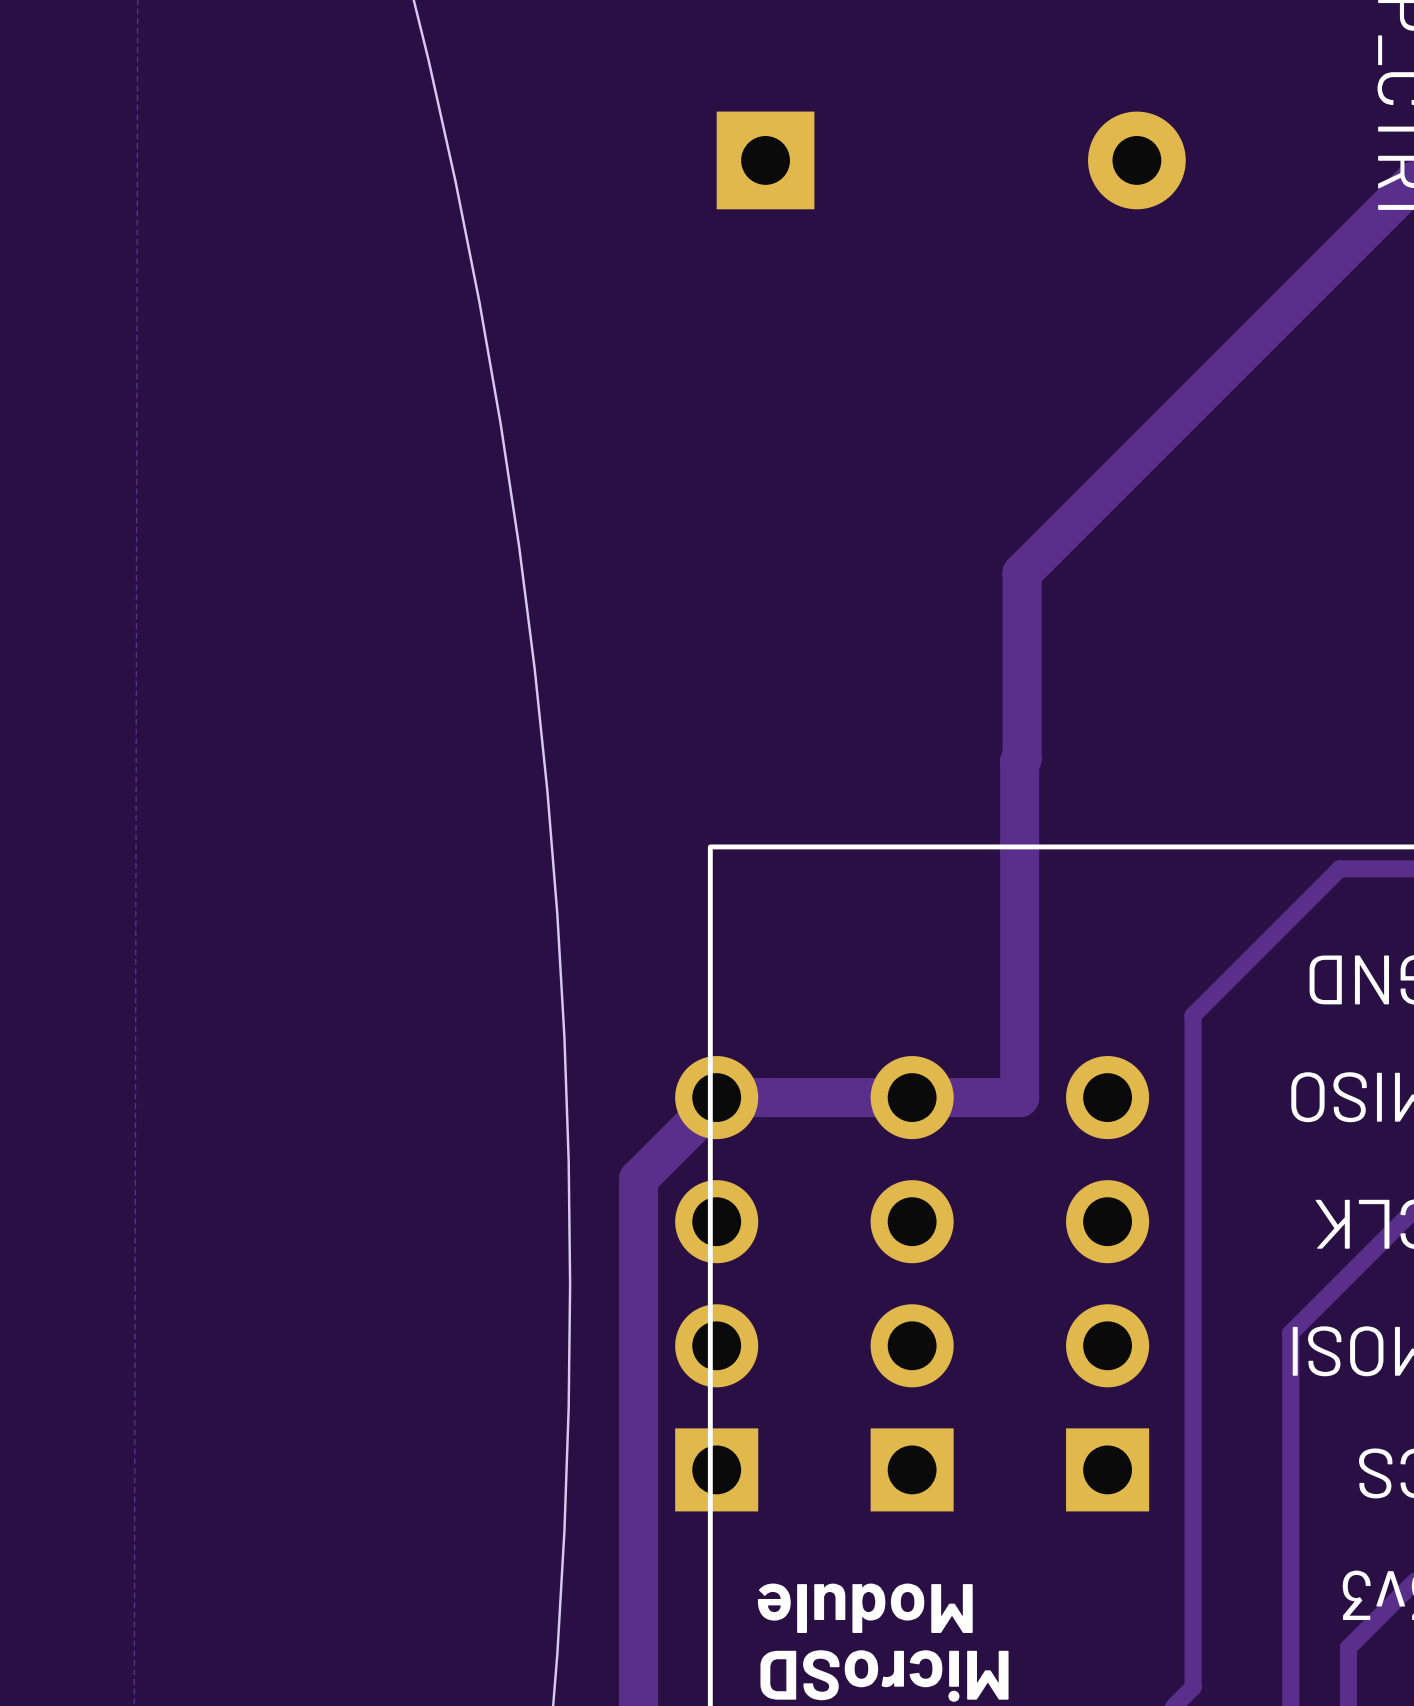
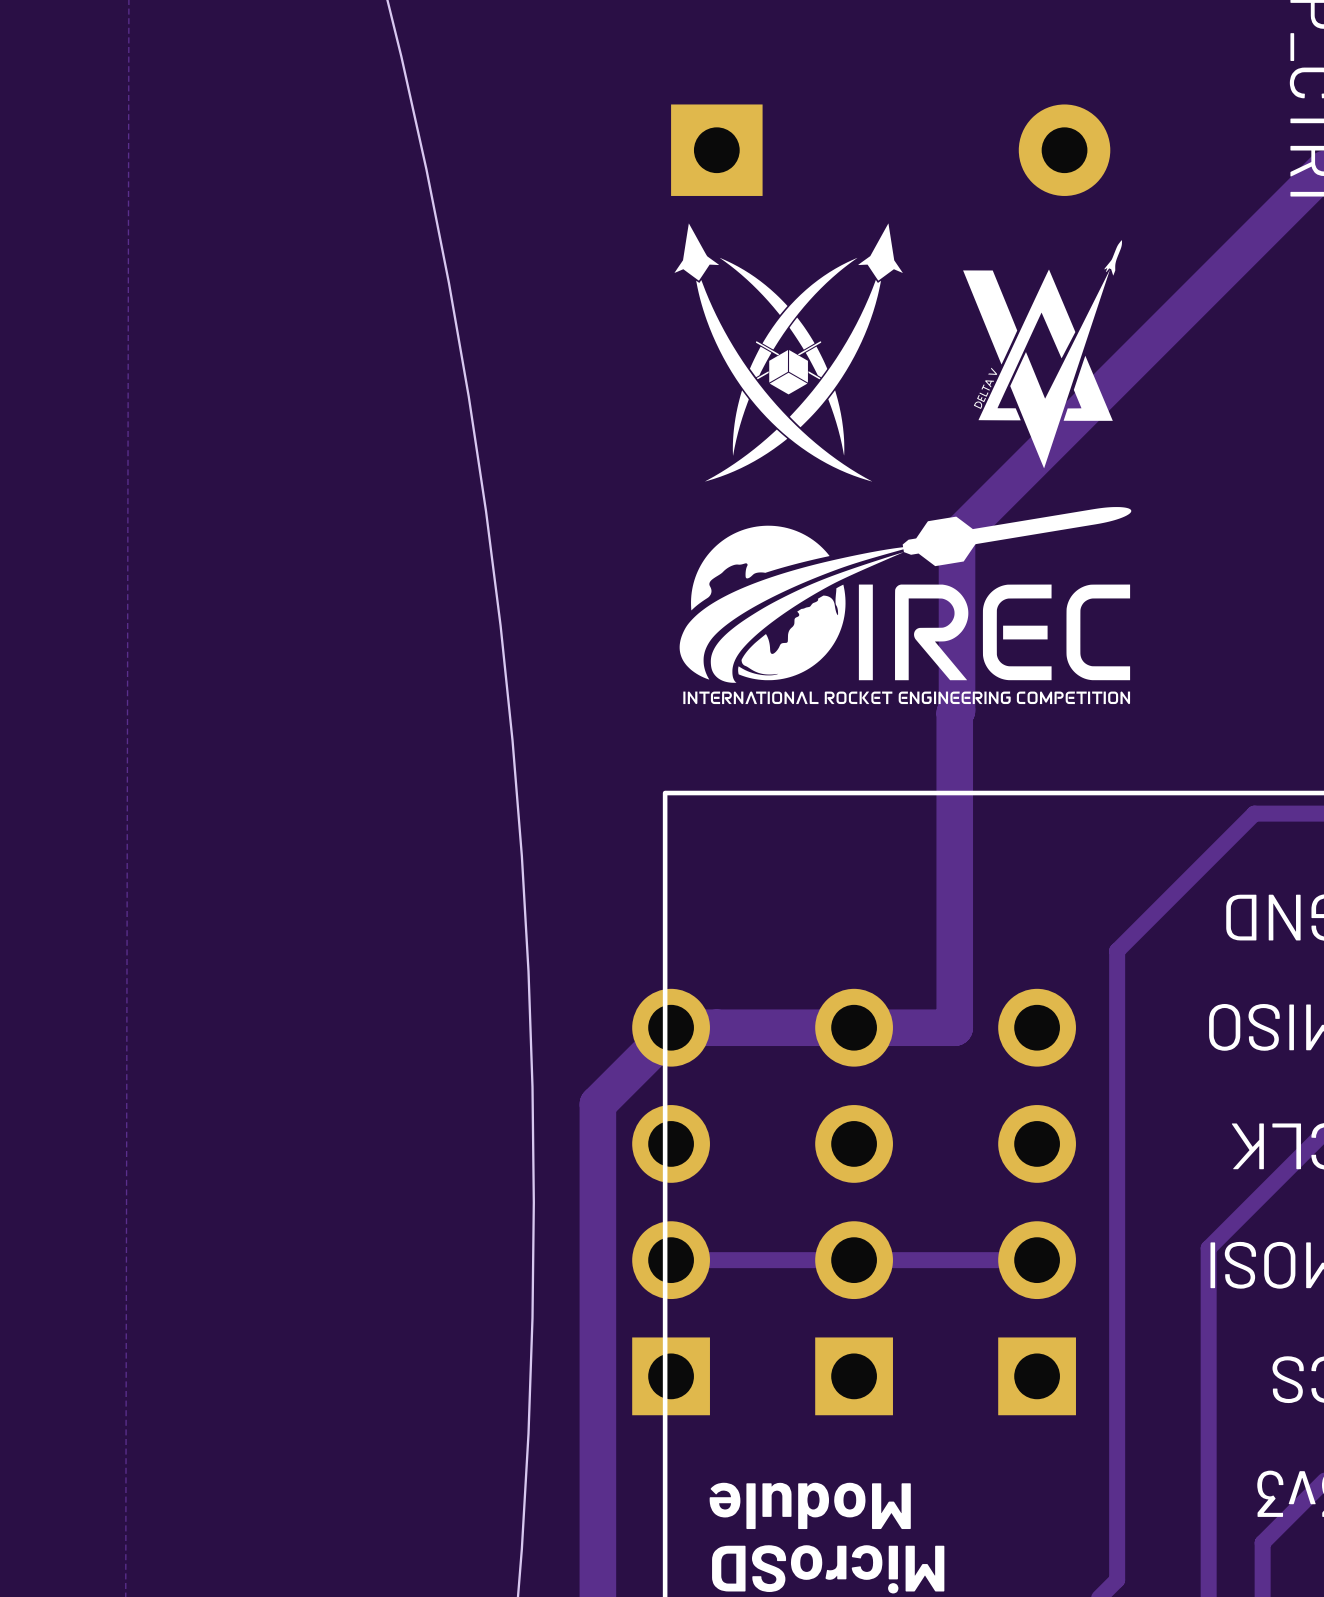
drawing: none -> [674, 223, 1132, 705]
track: none -> (1037, 1260) (671, 1260)

